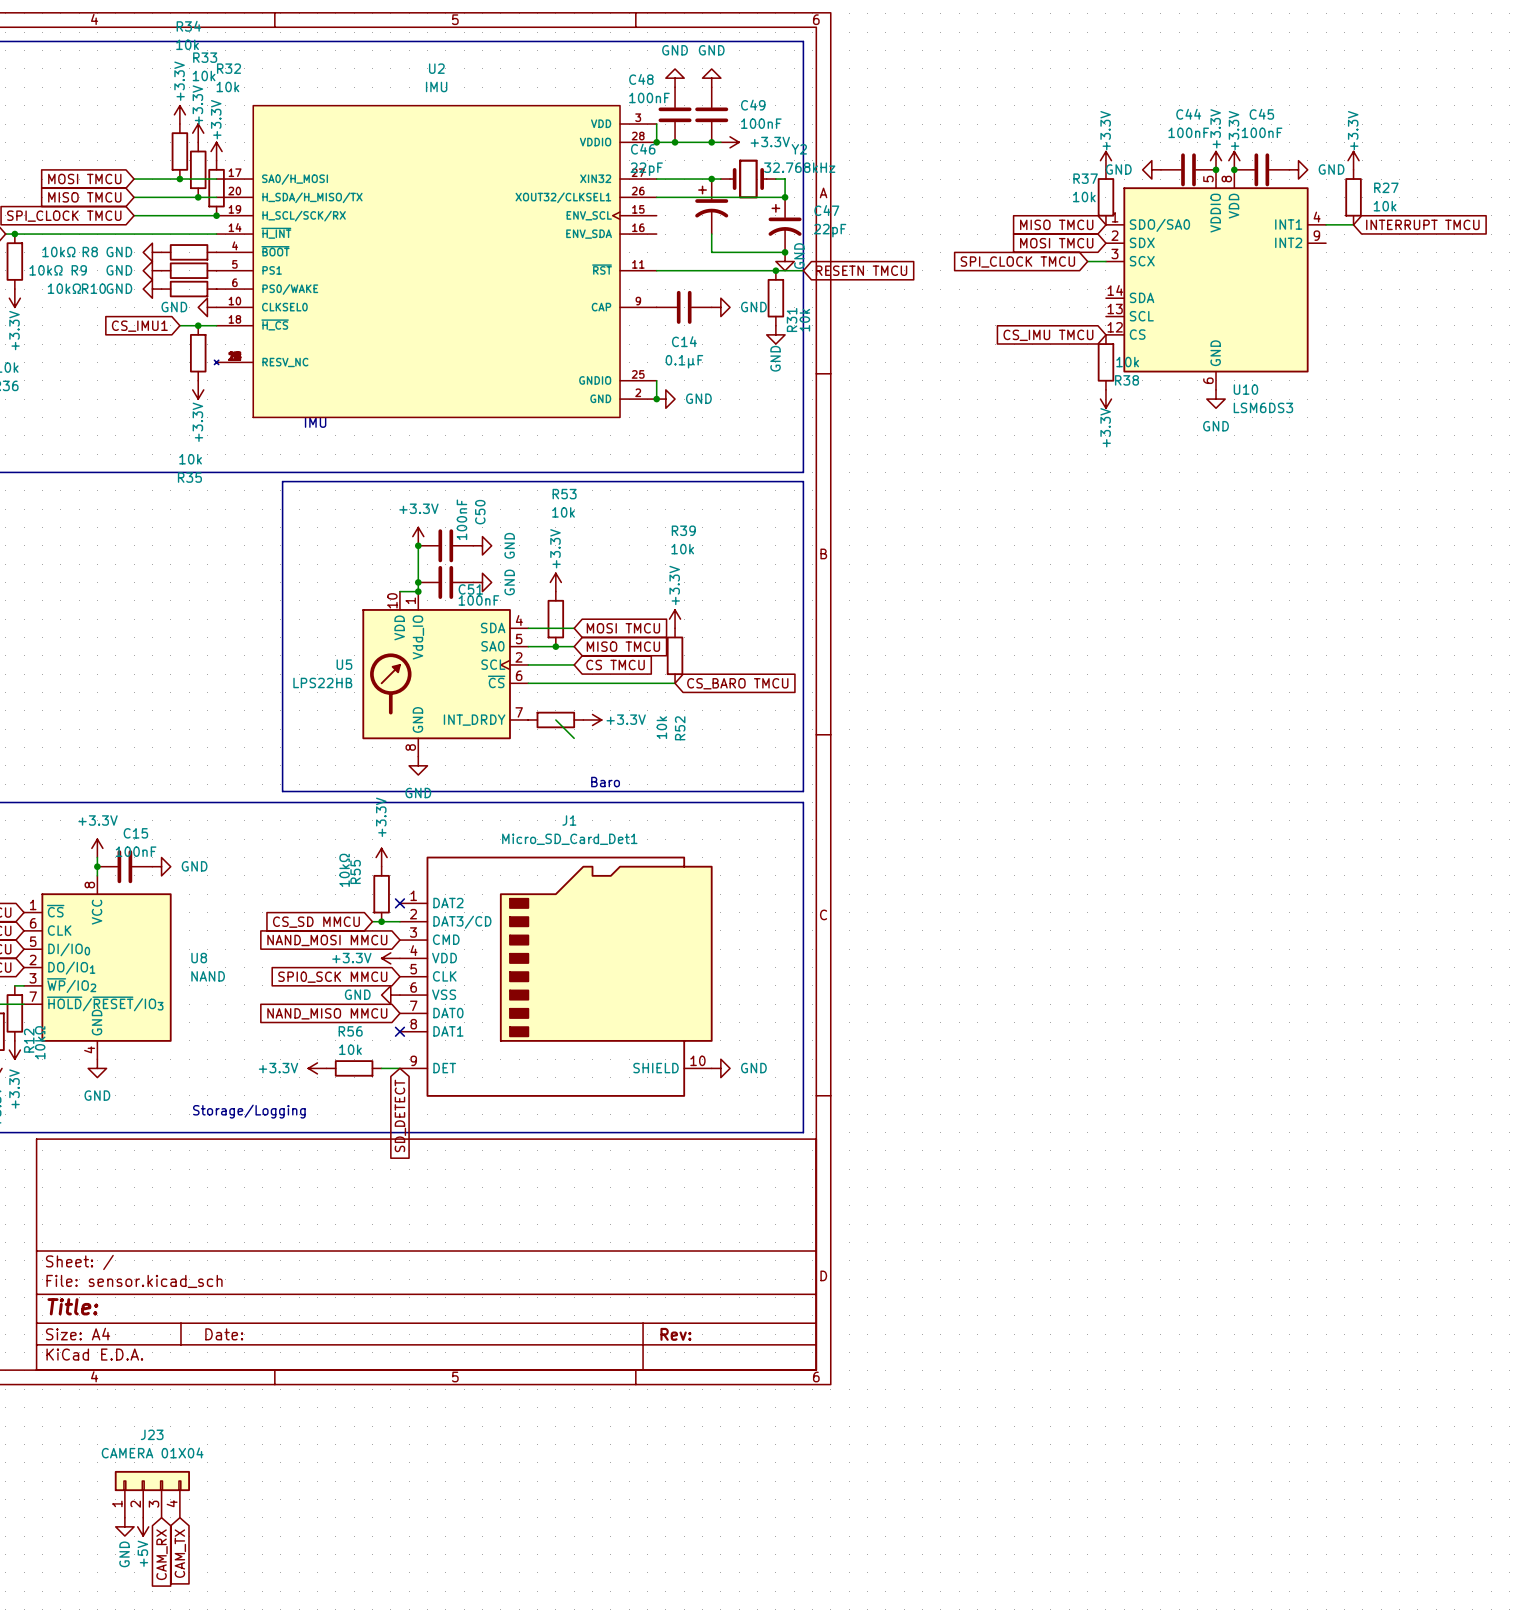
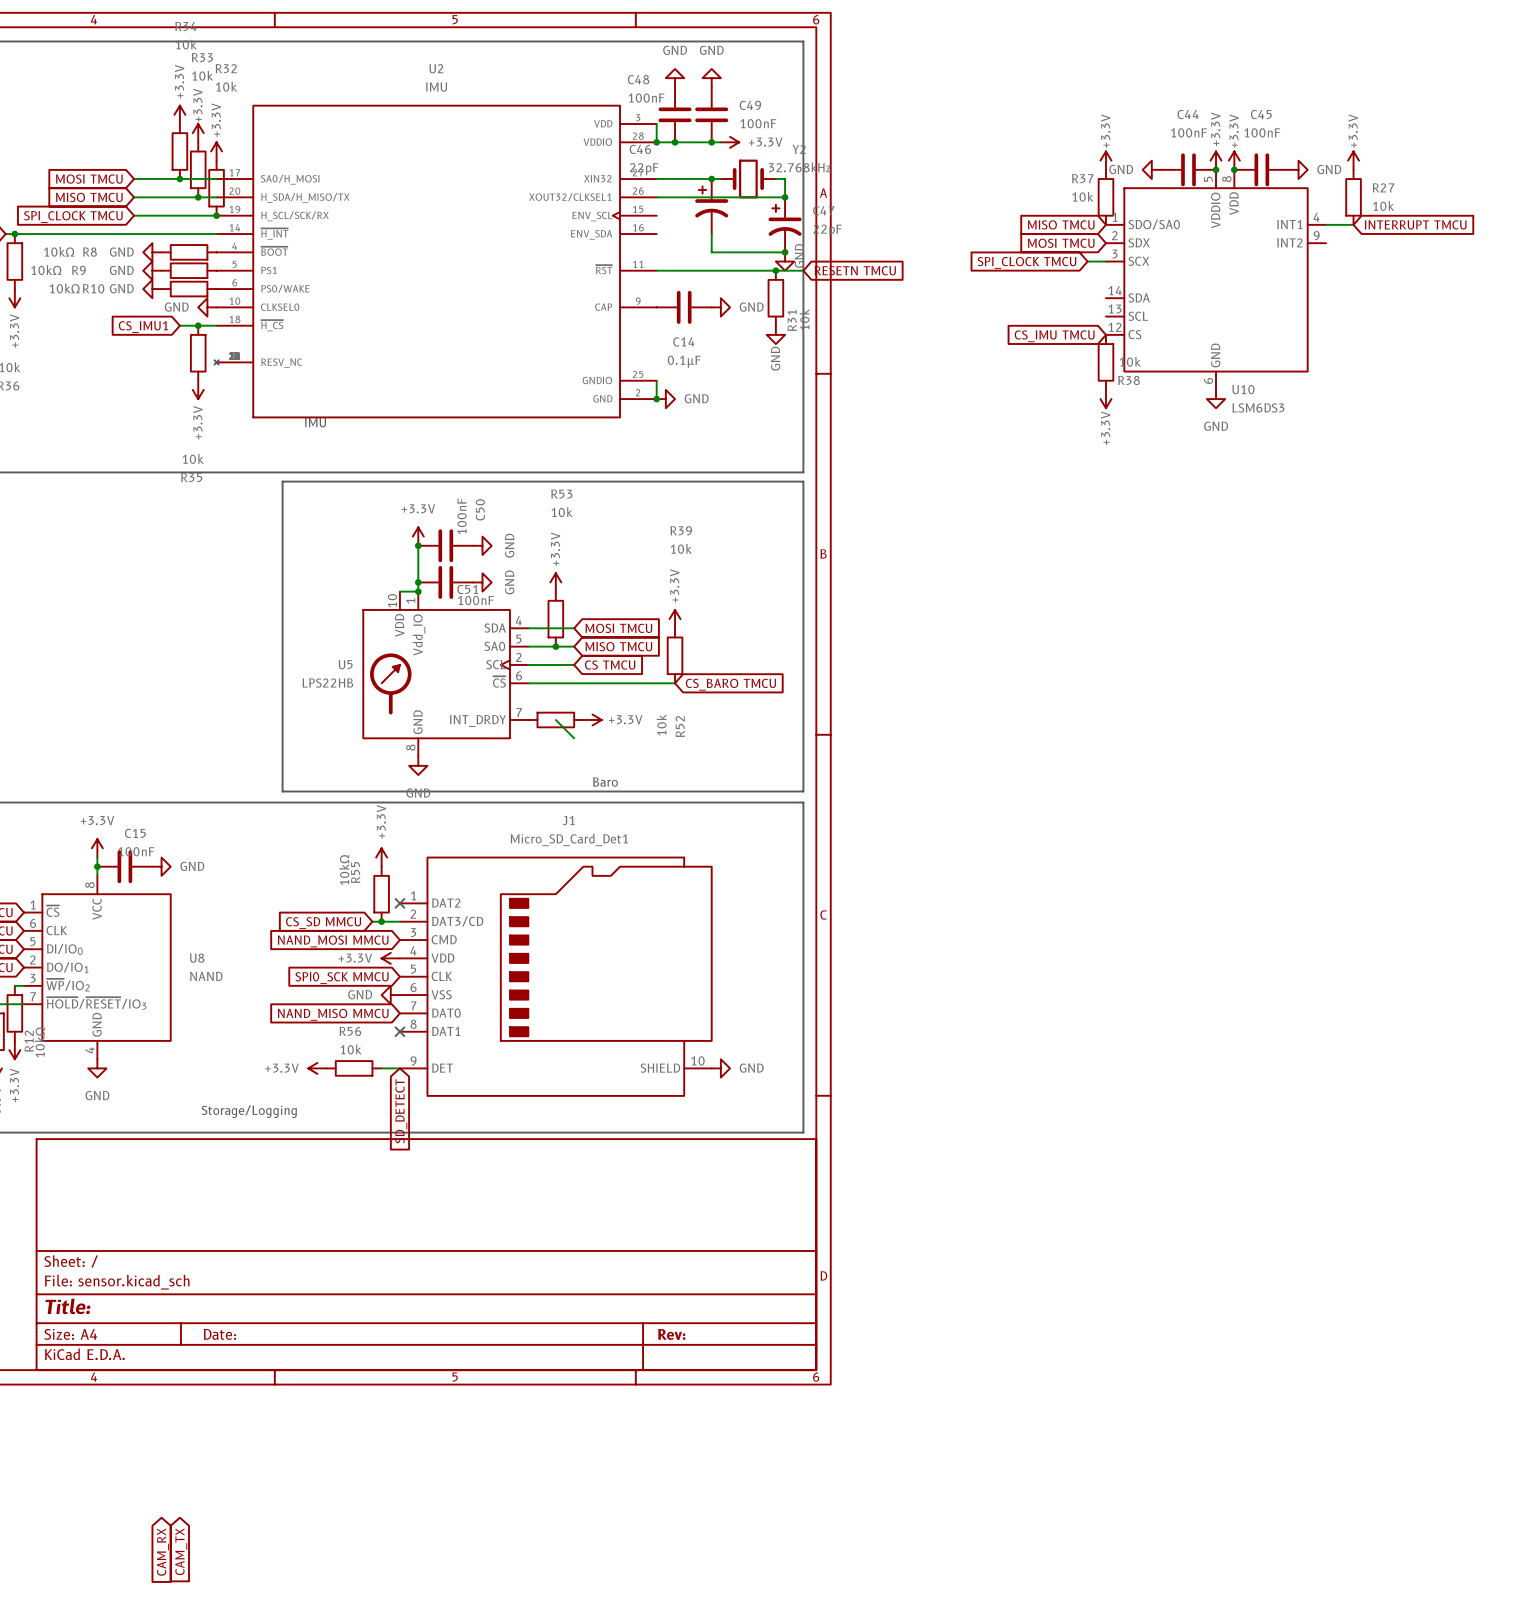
J23: CAMERA 01X04 (152, 1494) -> none
power symbol: GND (124, 1526) -> none
power symbol: +5V (143, 1526) -> none

